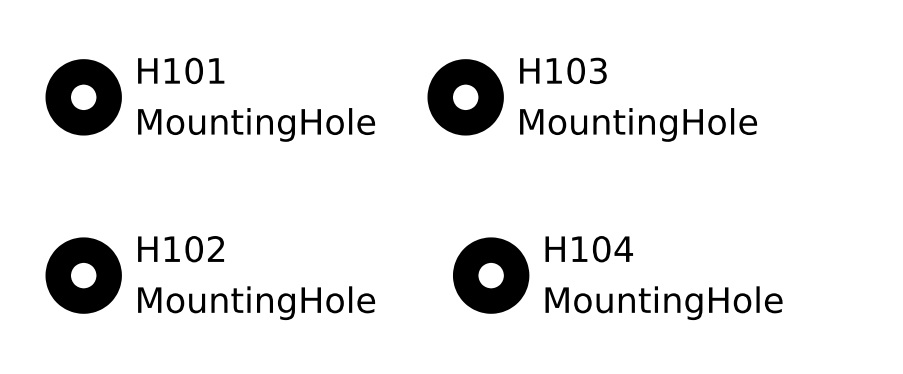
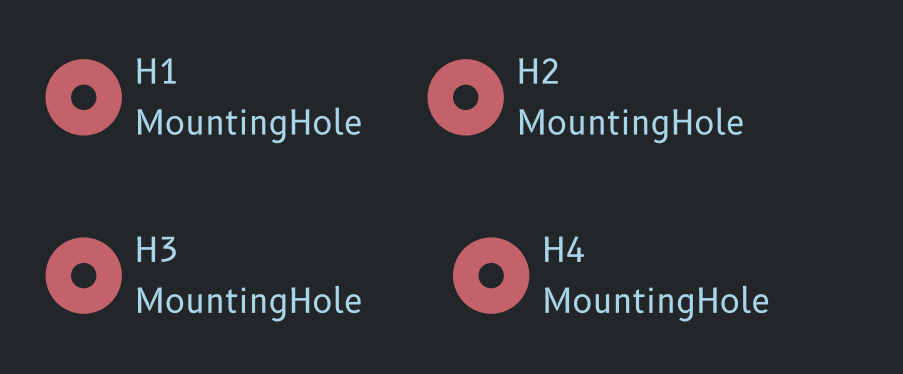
H101 name: H101 (181, 70) -> H1 (156, 70)
H103 name: H103 (563, 70) -> H2 (538, 70)
H102 name: H102 (181, 249) -> H3 (156, 249)
H104 name: H104 (589, 249) -> H4 (564, 249)

